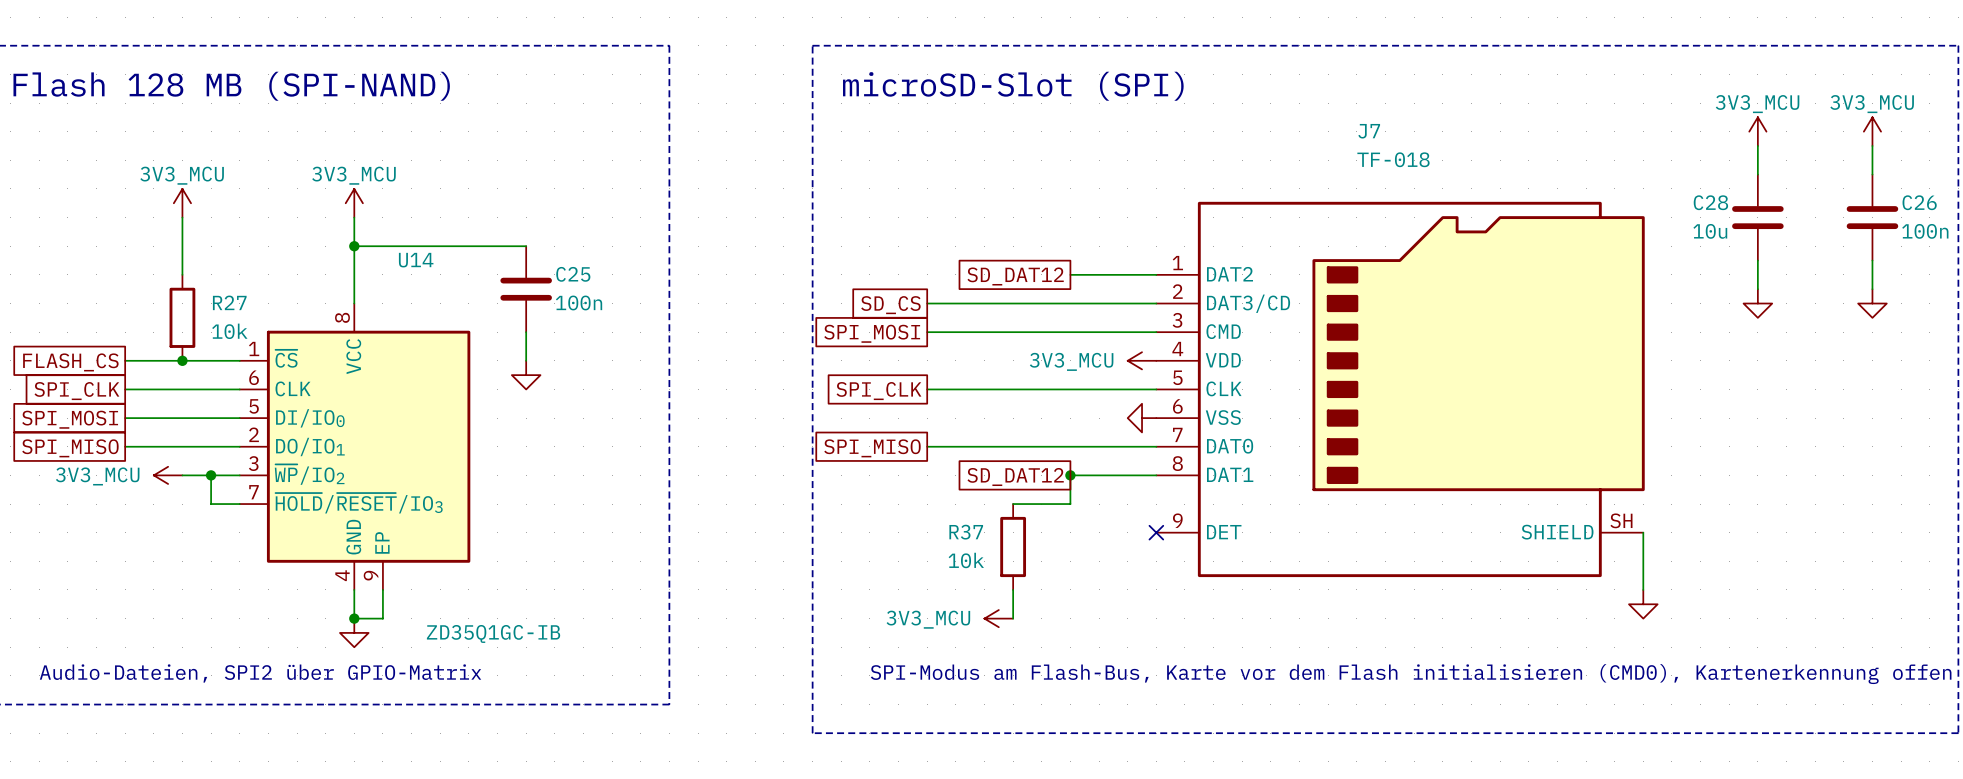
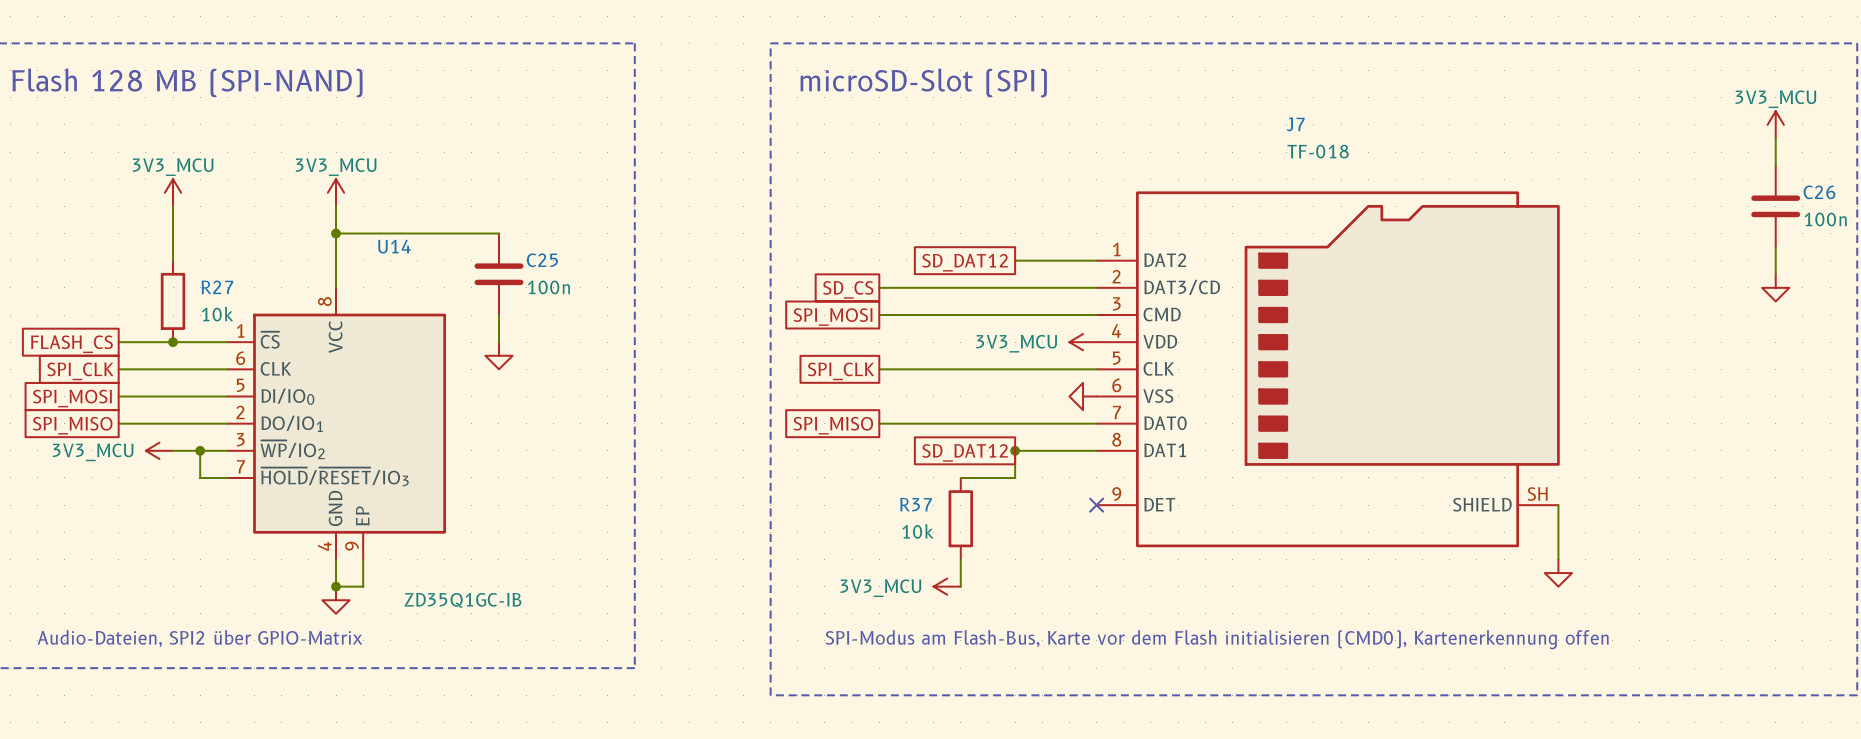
power symbol: 3V3_MCU (1757, 131) -> none
wire: (1757, 145) (1757, 174) -> none
C28: 10u (1757, 217) -> none
wire: (1757, 260) (1757, 289) -> none
power symbol: (1757, 303) -> none

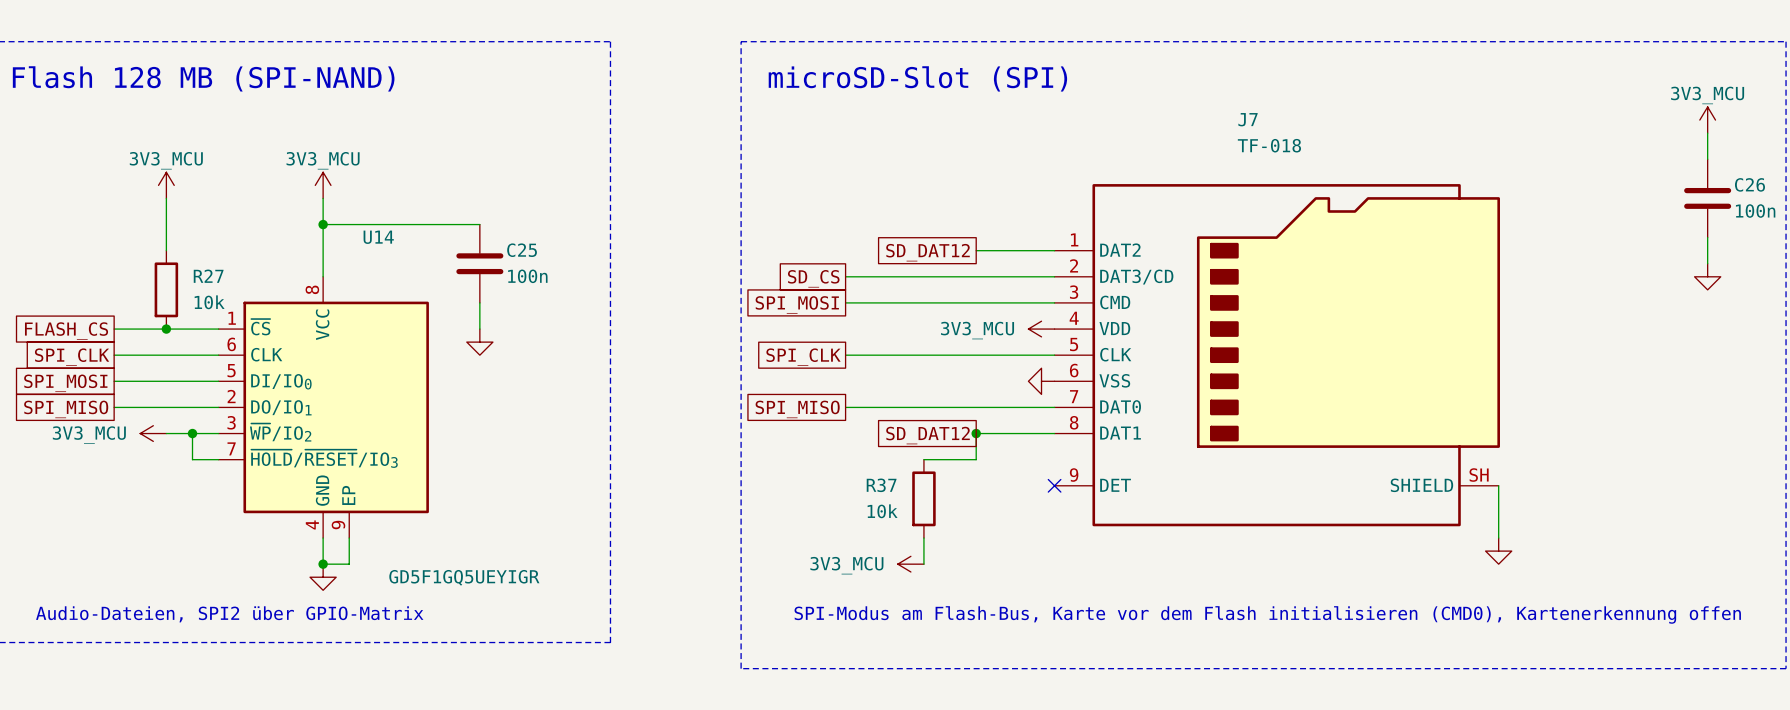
U14 value: ZD35Q1GC-IB (462, 600) -> GD5F1GQ5UEYIGR (464, 577)

